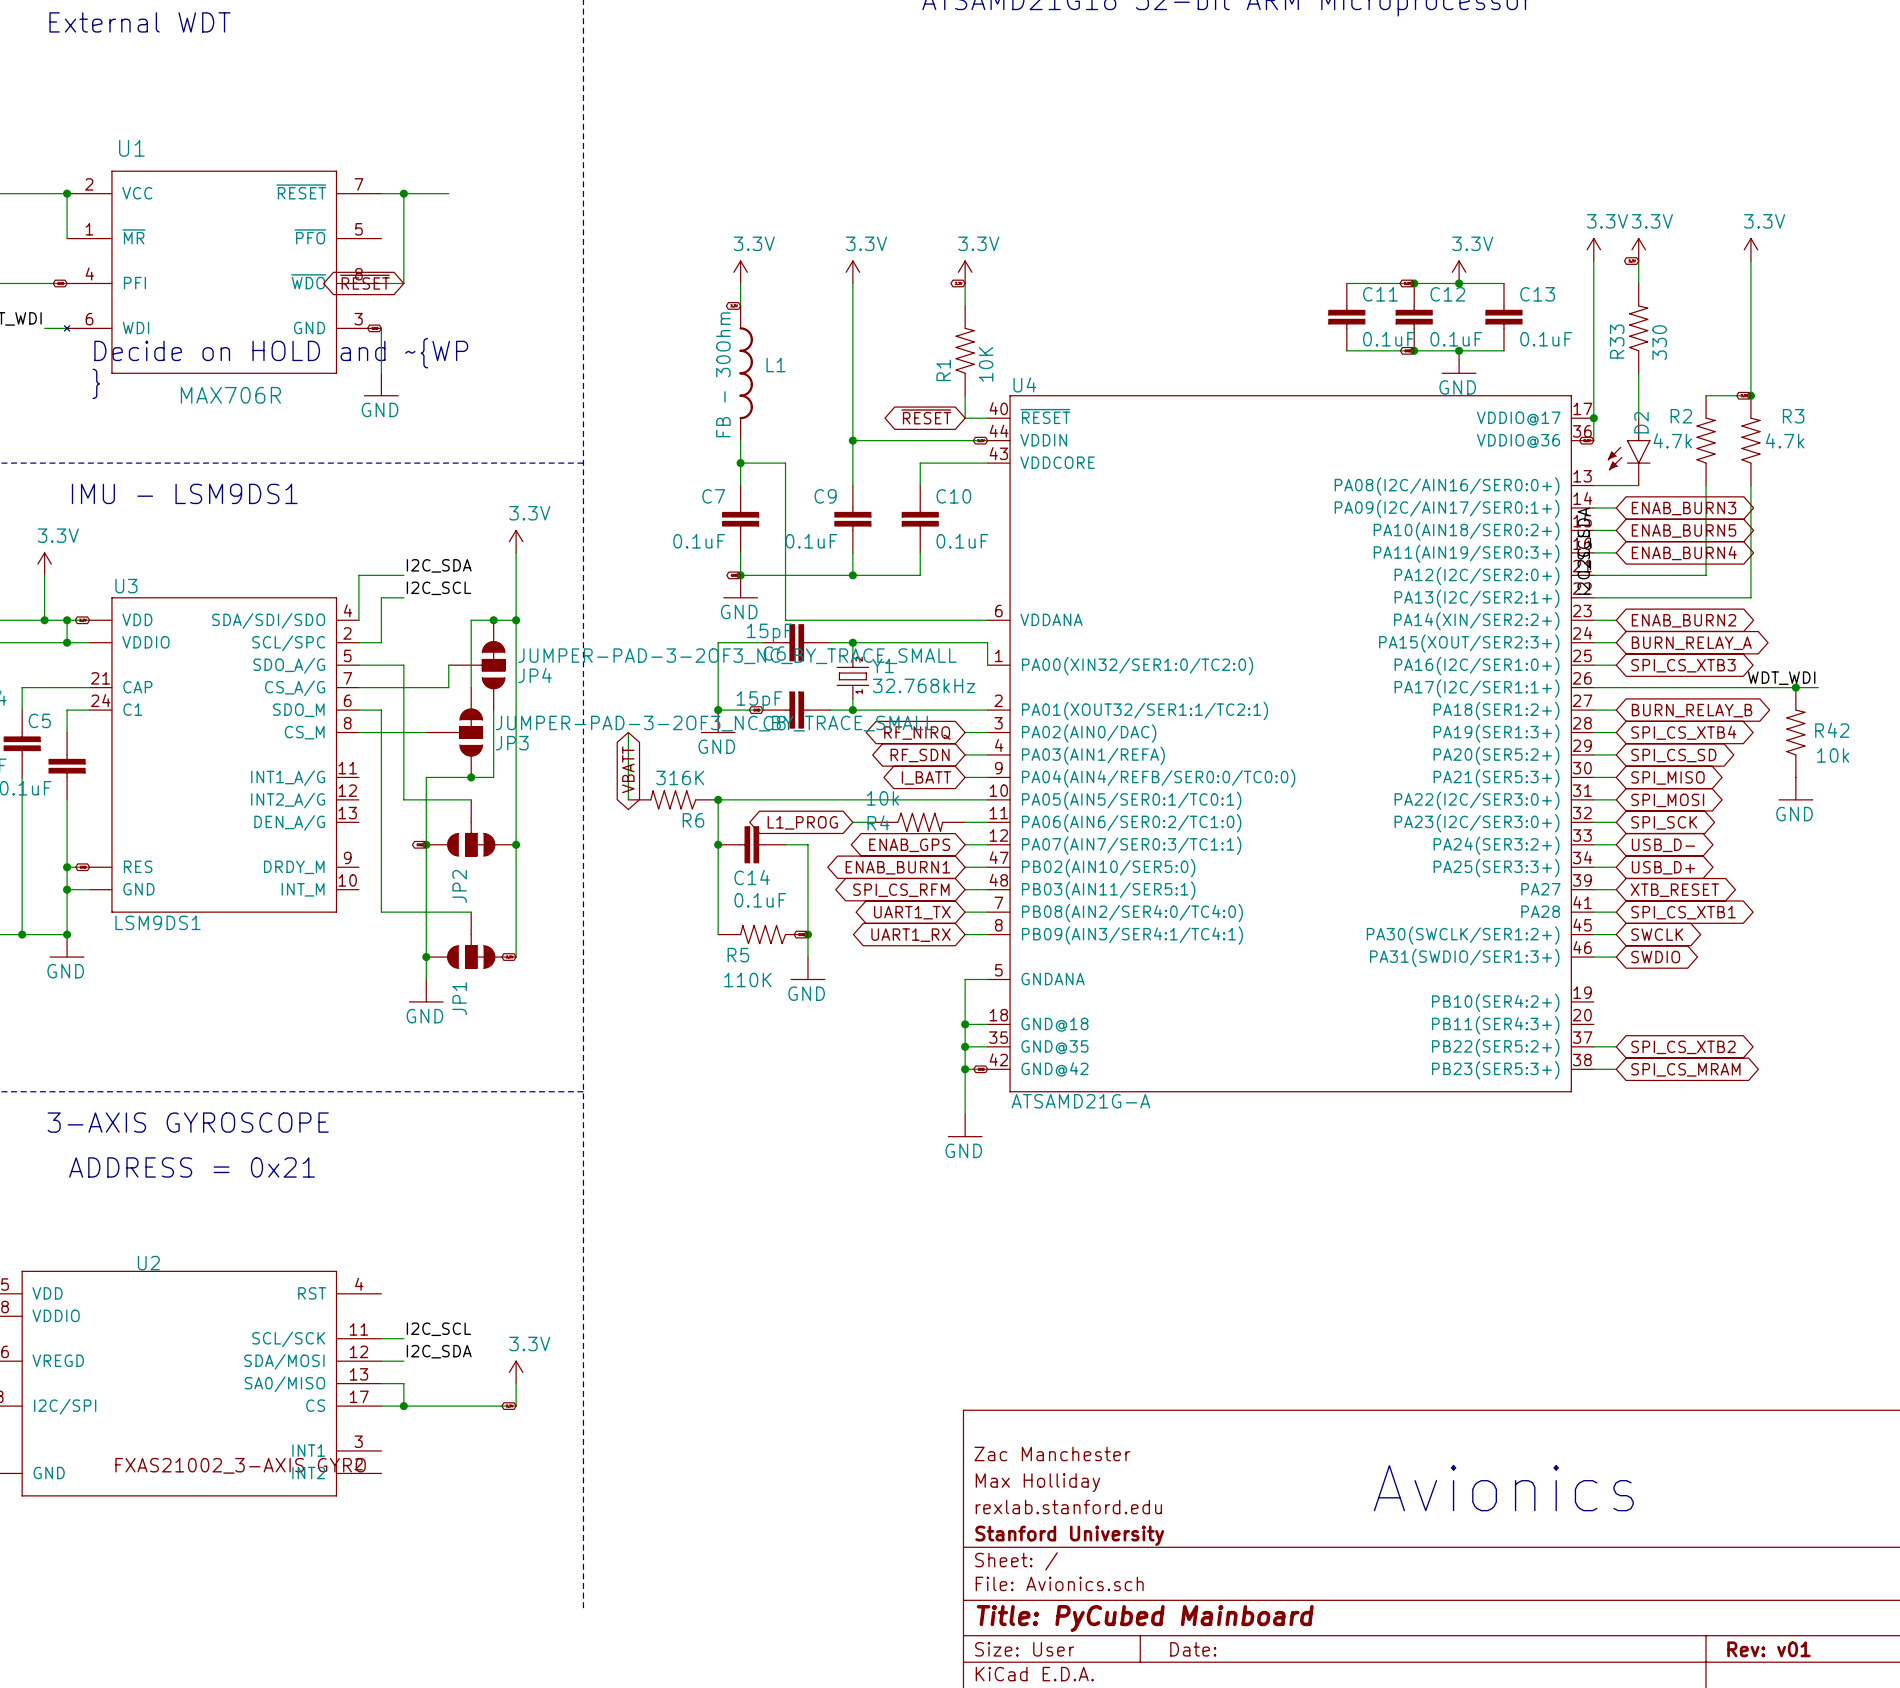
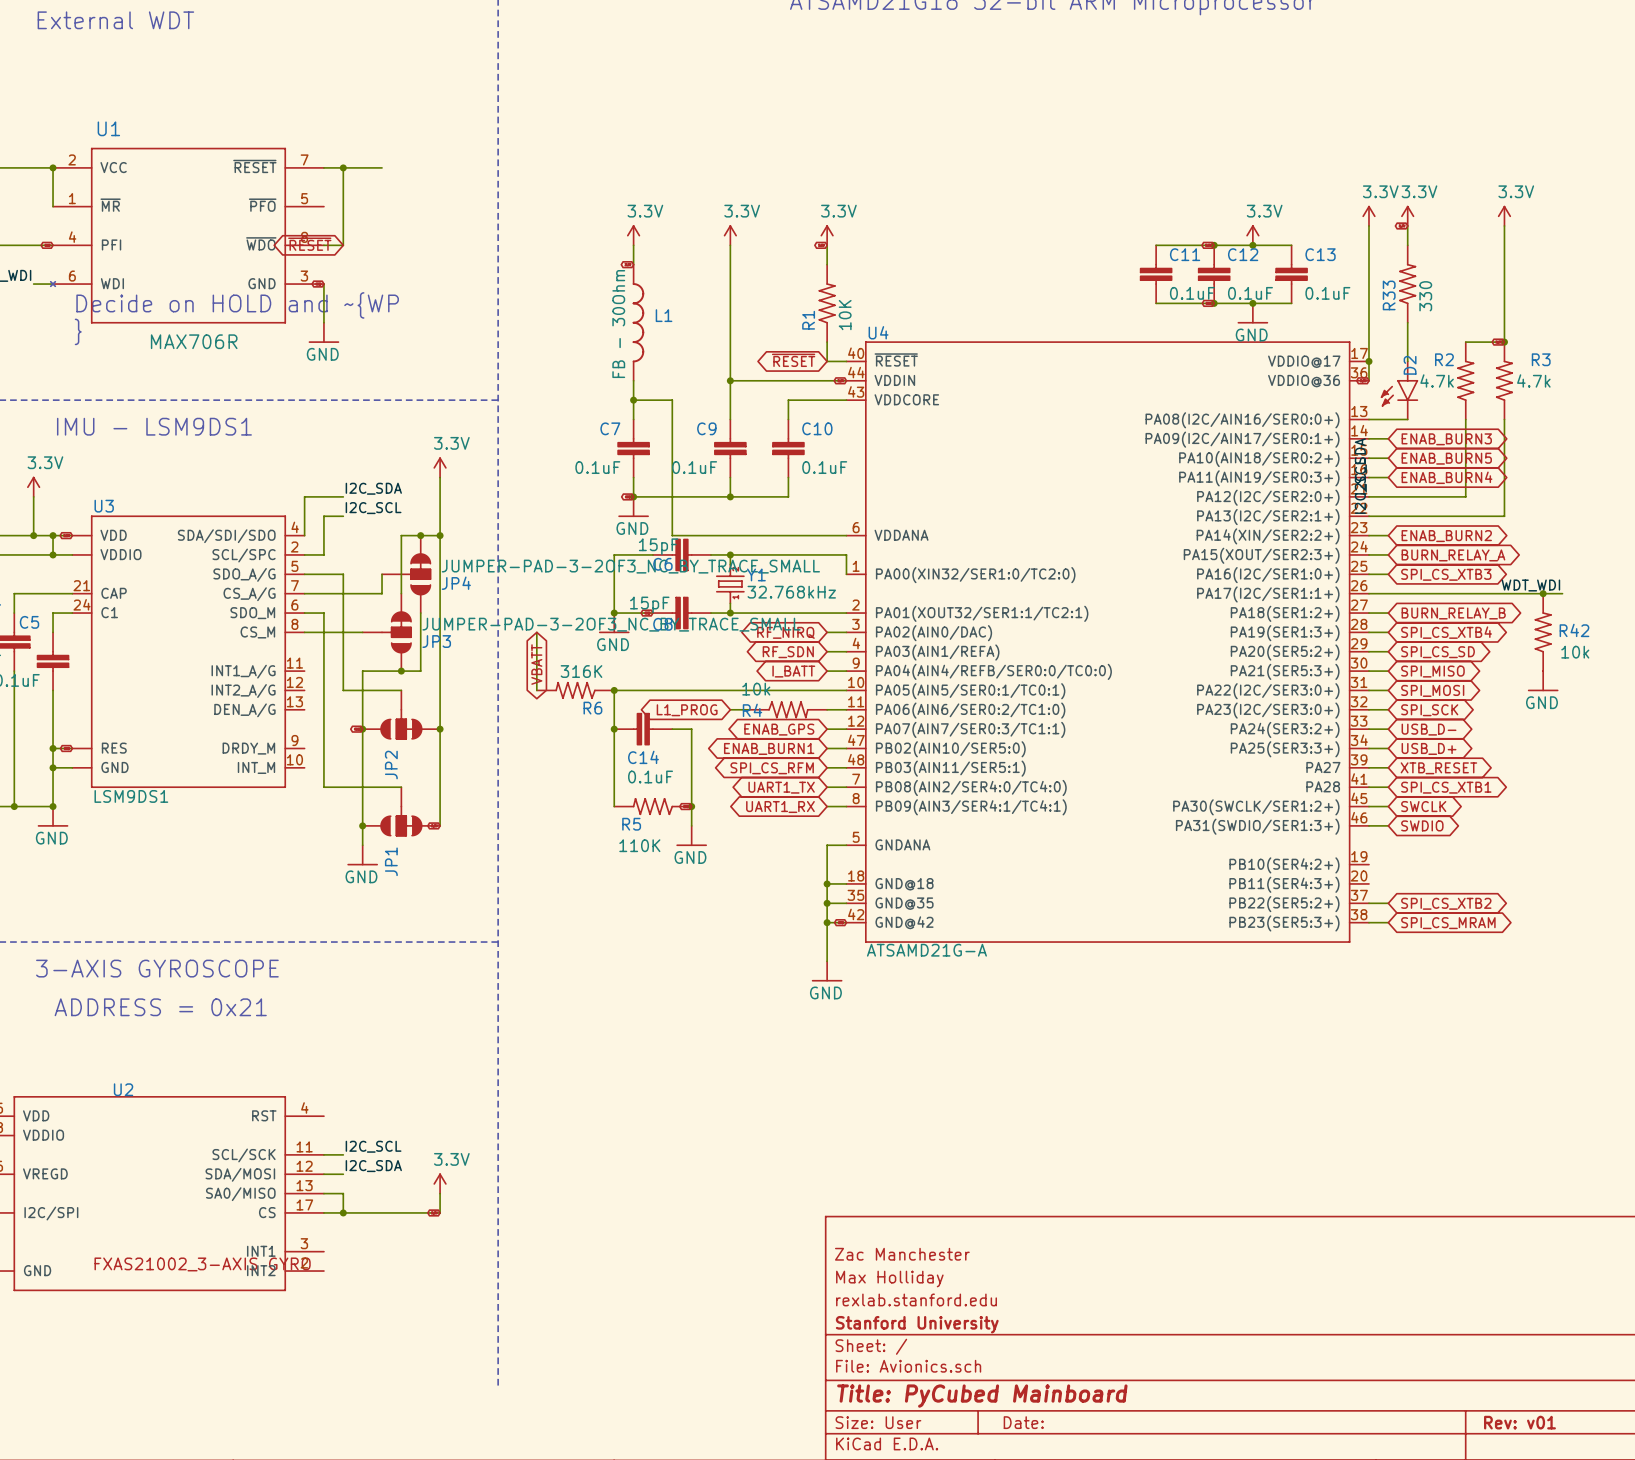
text: Avionics (1503, 1488) -> none

